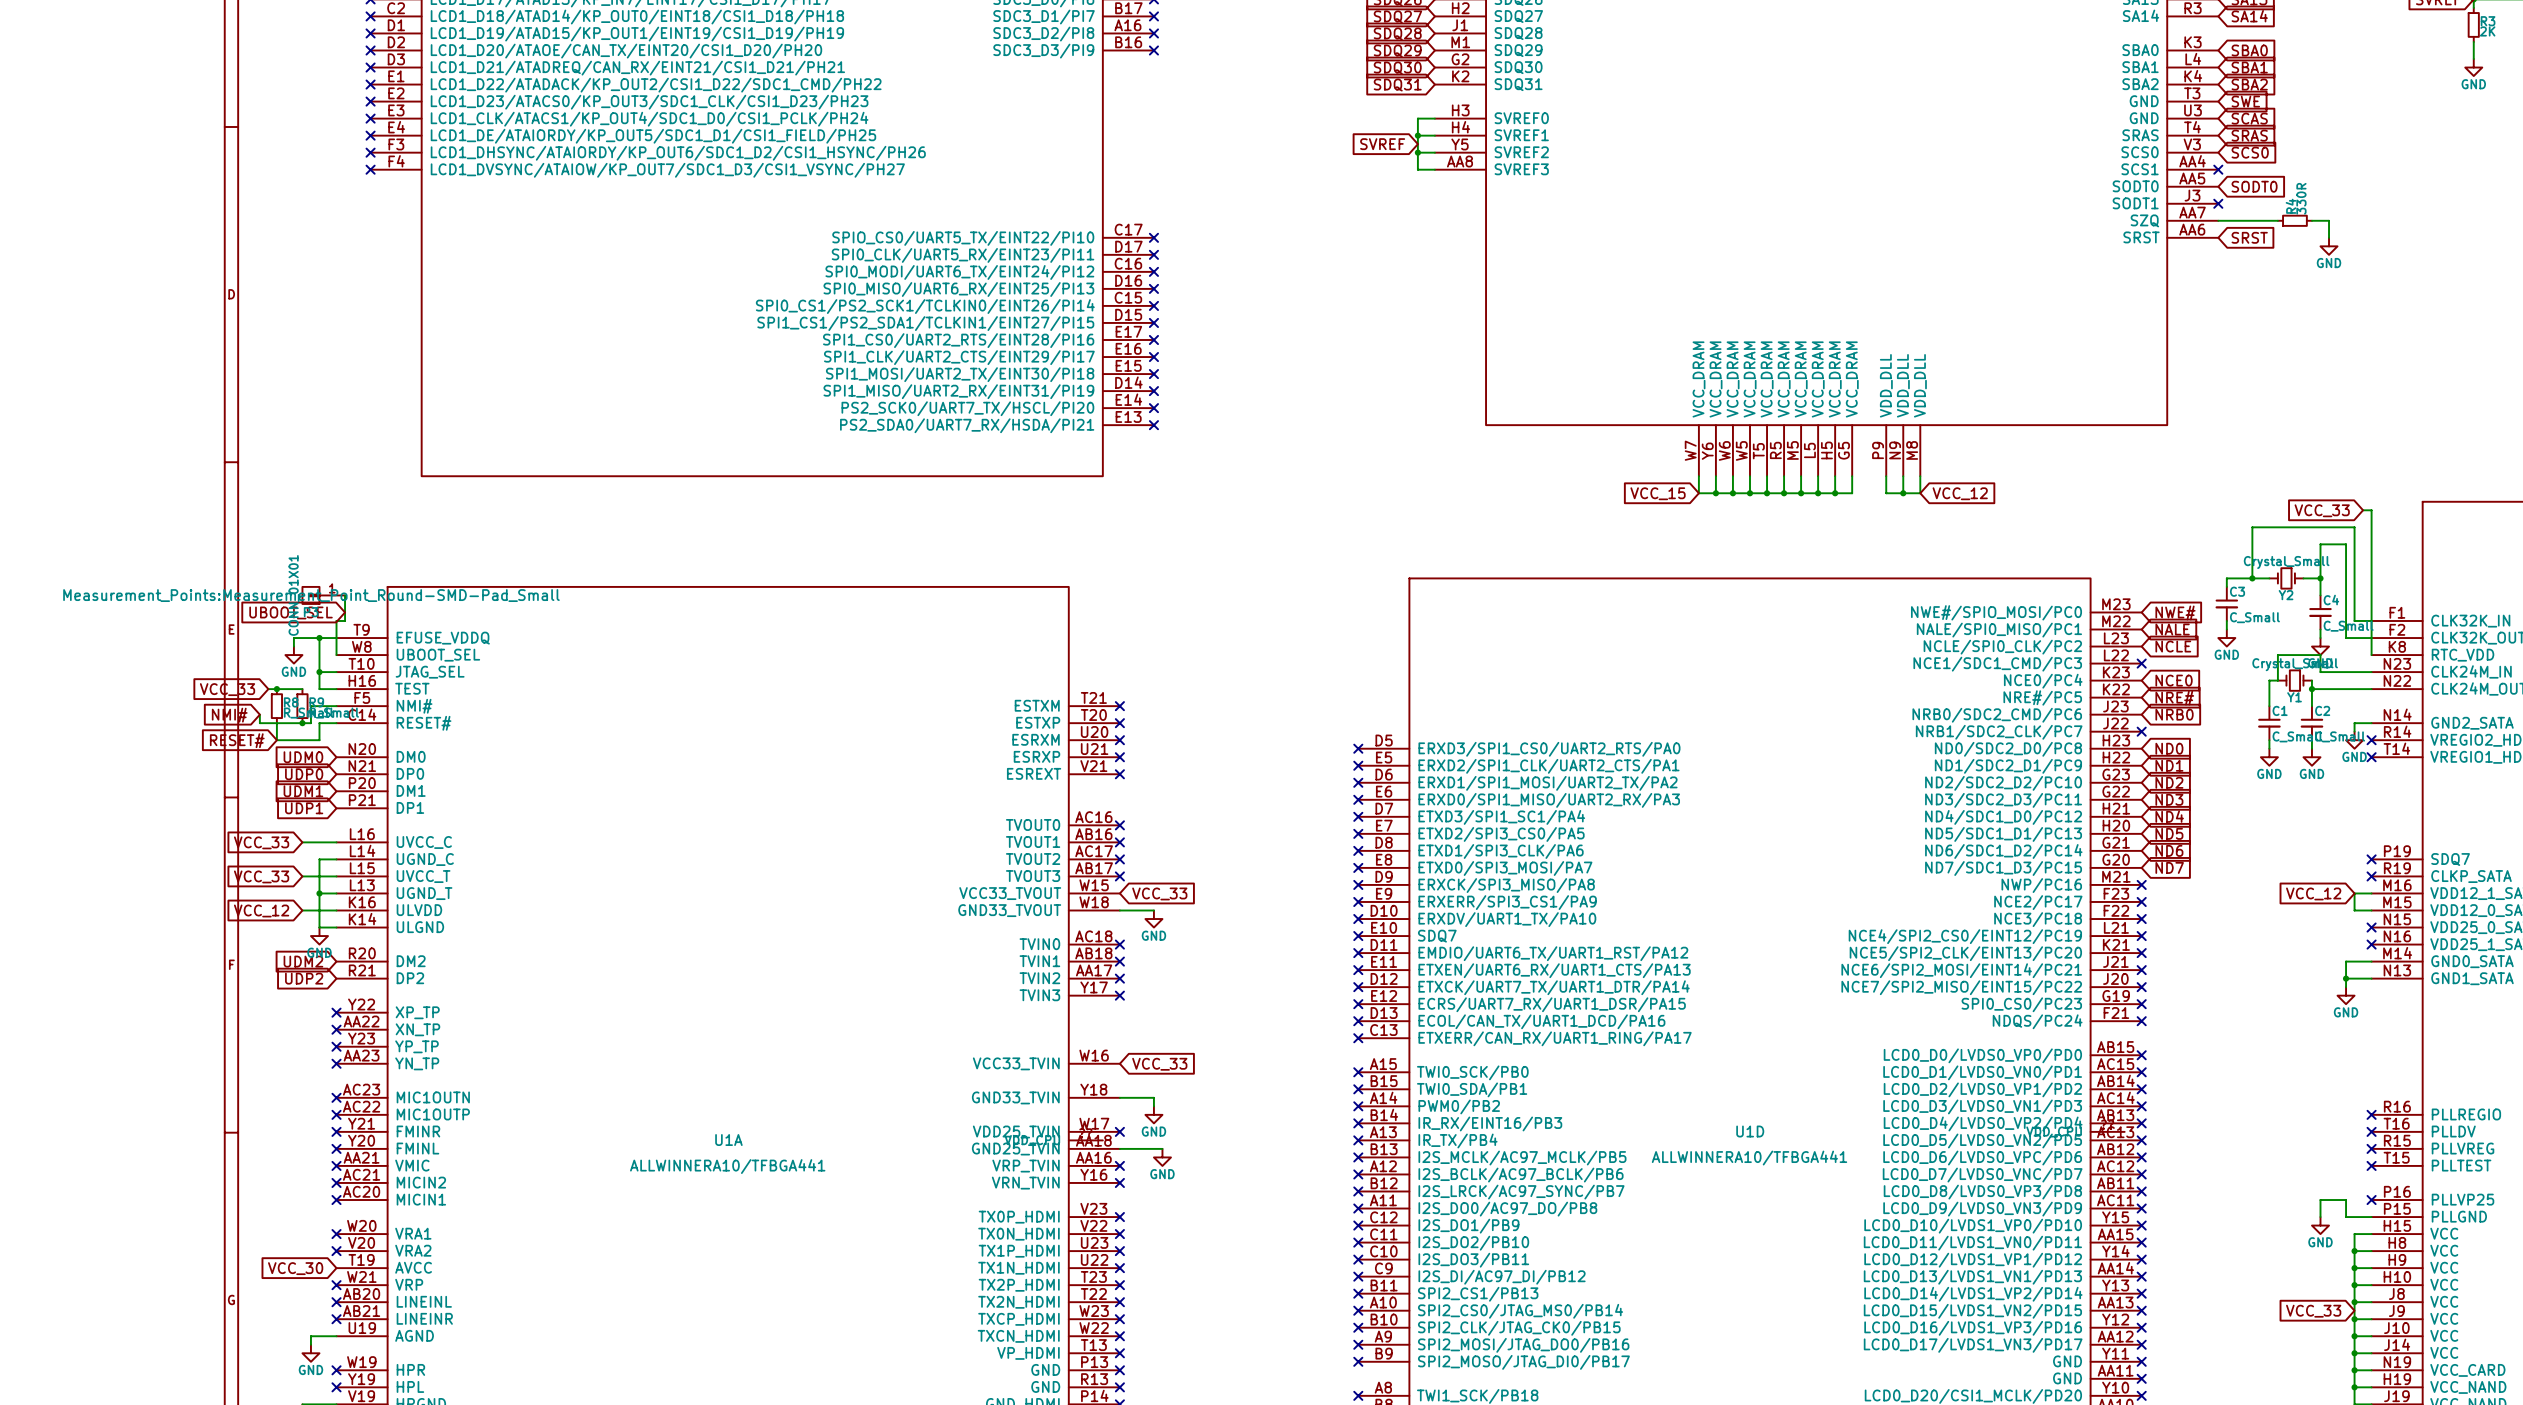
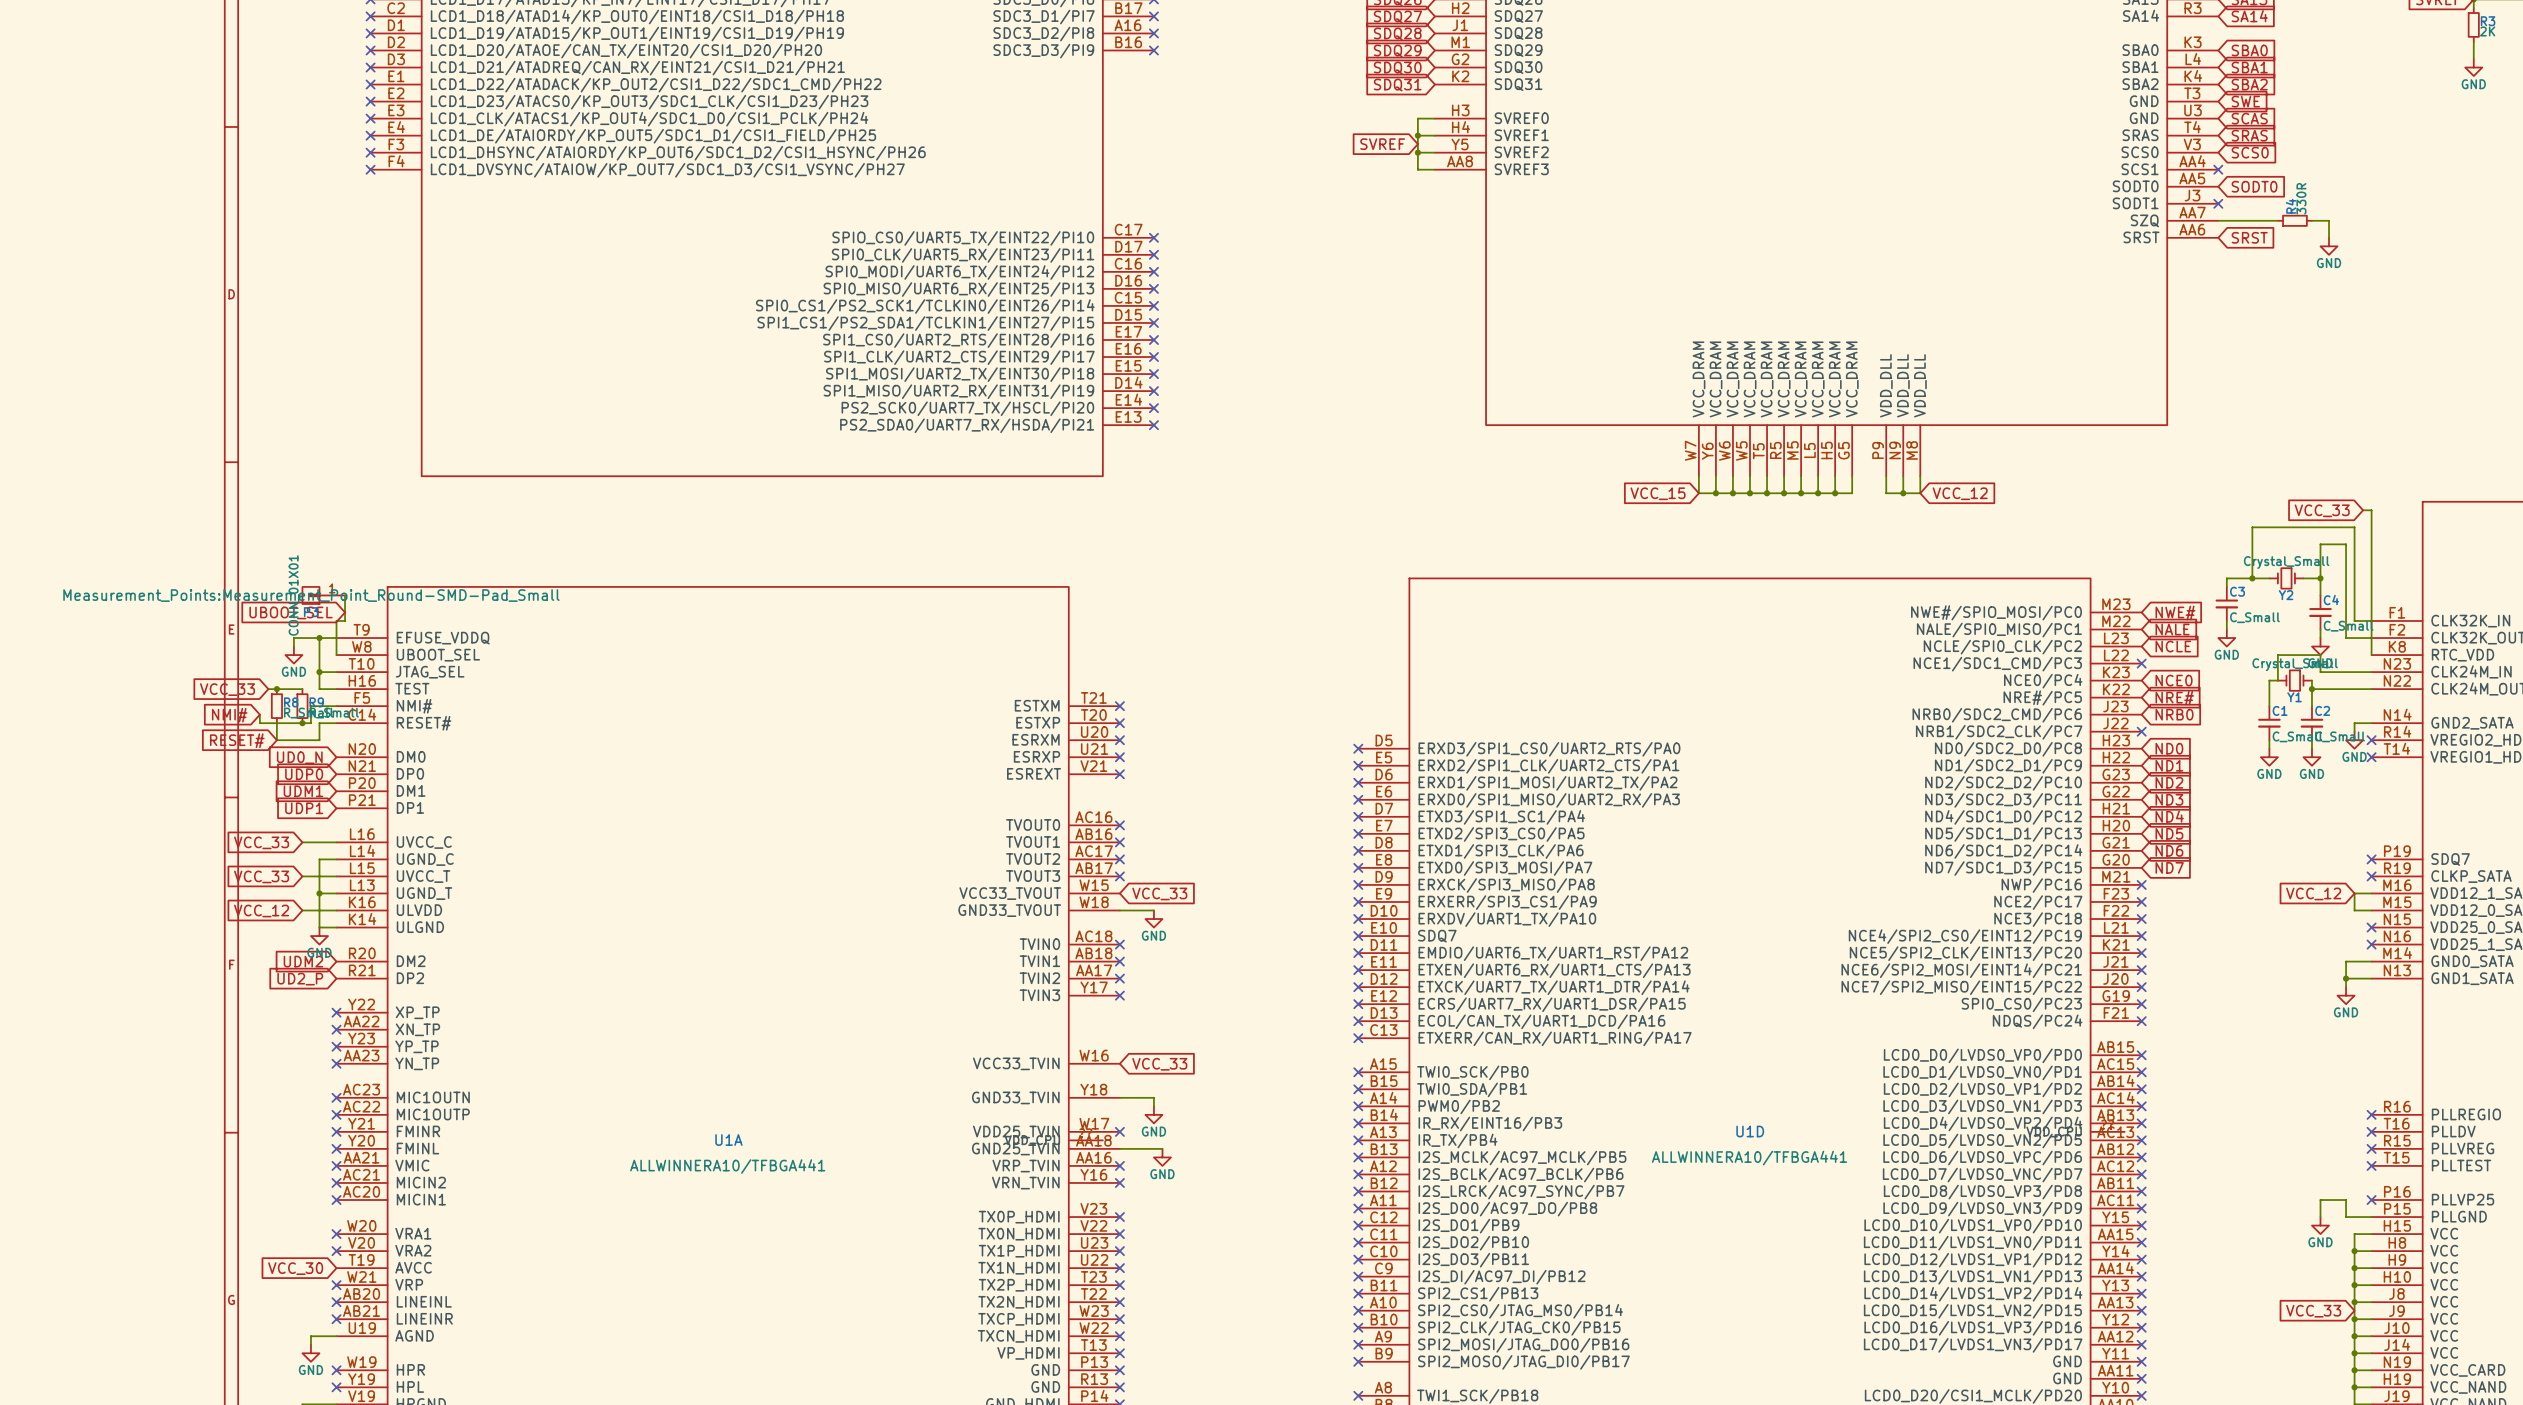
global label: UDM0 (303, 757) -> UD0_N (299, 757)
global label: UDP2 (304, 978) -> UD2_P (300, 979)

